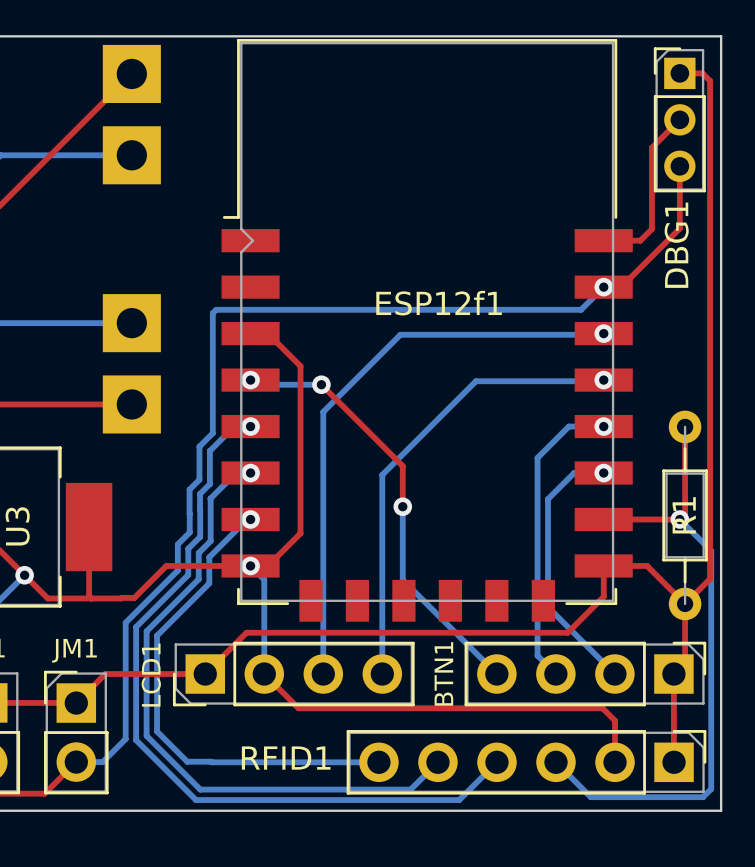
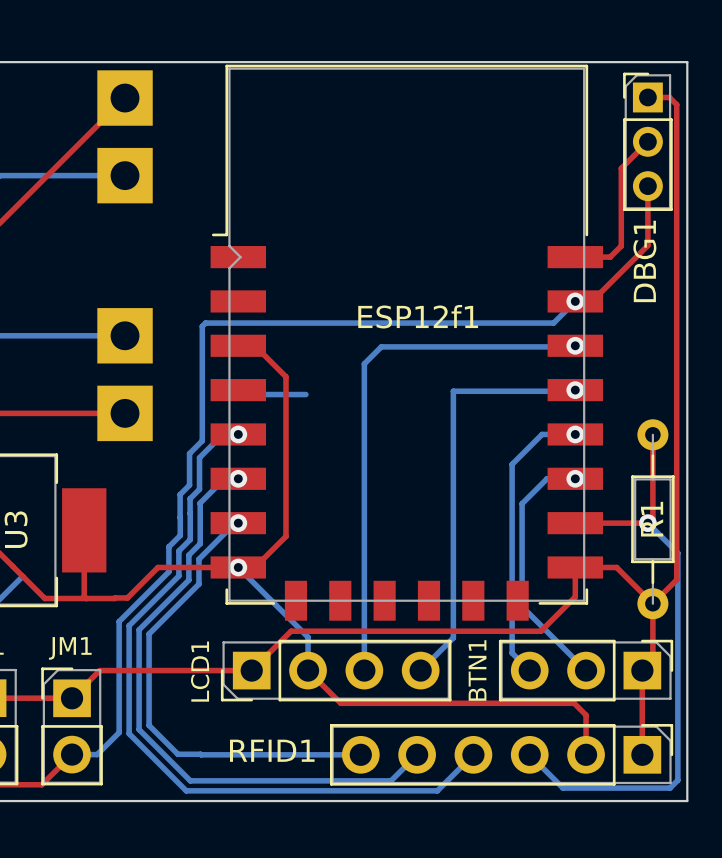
bottom track: (382, 352) (323, 411) (323, 674) -> (364, 363) (364, 670)
via: (250, 380) -> none
bottom track: (475, 381) (382, 474) (382, 674) -> (453, 391) (453, 637) (420, 670)
top track: (321, 384) (402, 466) (402, 506) -> none
via: (321, 384) -> none
bottom track: (402, 506) (402, 579) (496, 674) -> none
via: (402, 506) -> none
via: (24, 575) -> none
bottom track: (264, 579) (264, 674) -> (251, 580) (308, 637) (308, 670)
top track: (305, 632) (246, 632) (205, 674) -> (291, 631) (251, 670) (195, 670)
BTN1 footprint: [464, 641, 707, 707] -> [498, 639, 674, 702]
top track: (264, 674) (298, 708) (357, 708) -> (308, 670) (340, 703)
LCD1 position: (293, 674) -> (336, 670)

